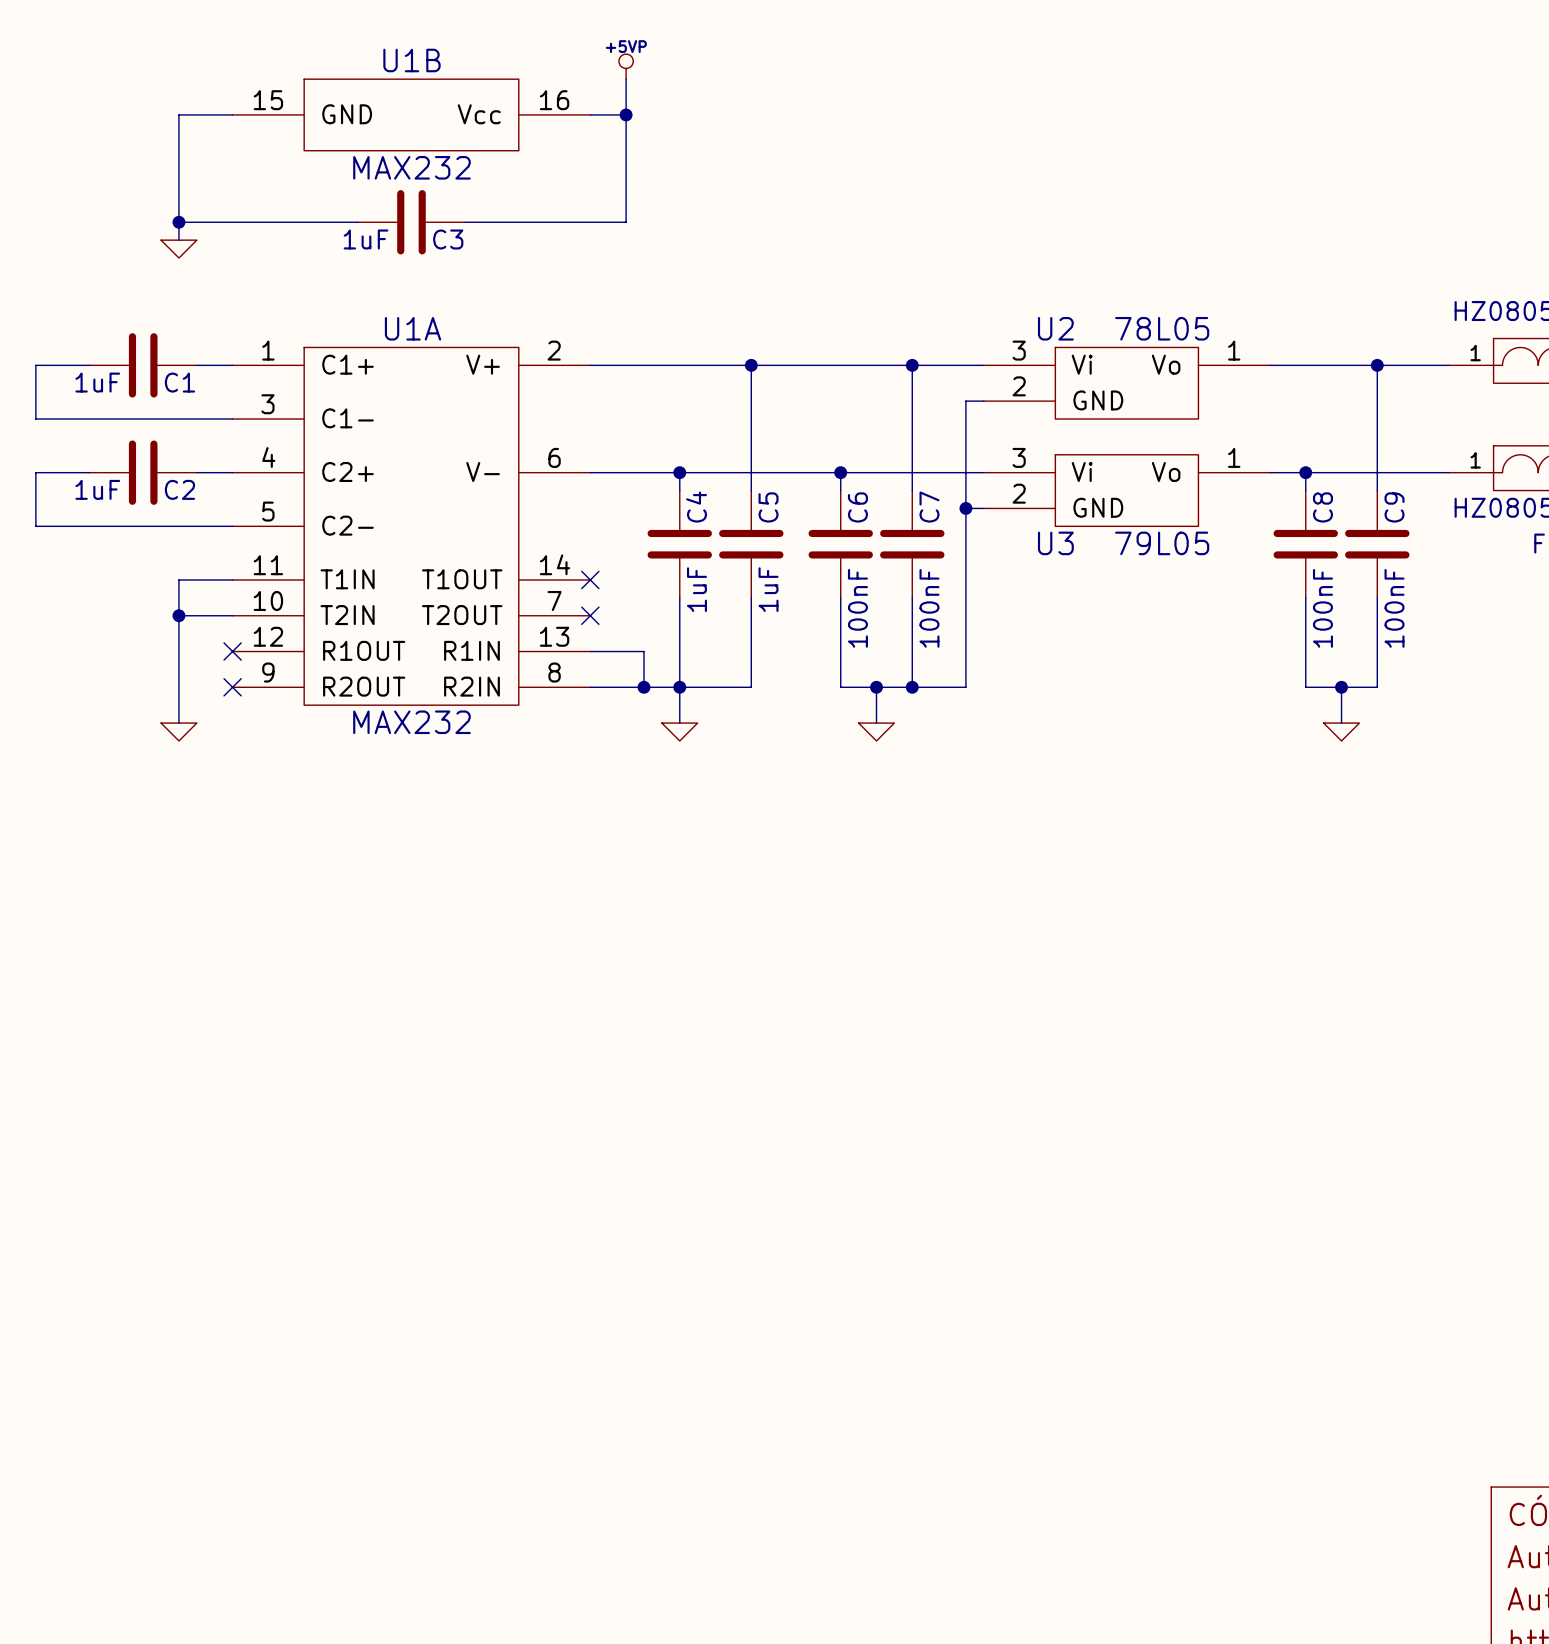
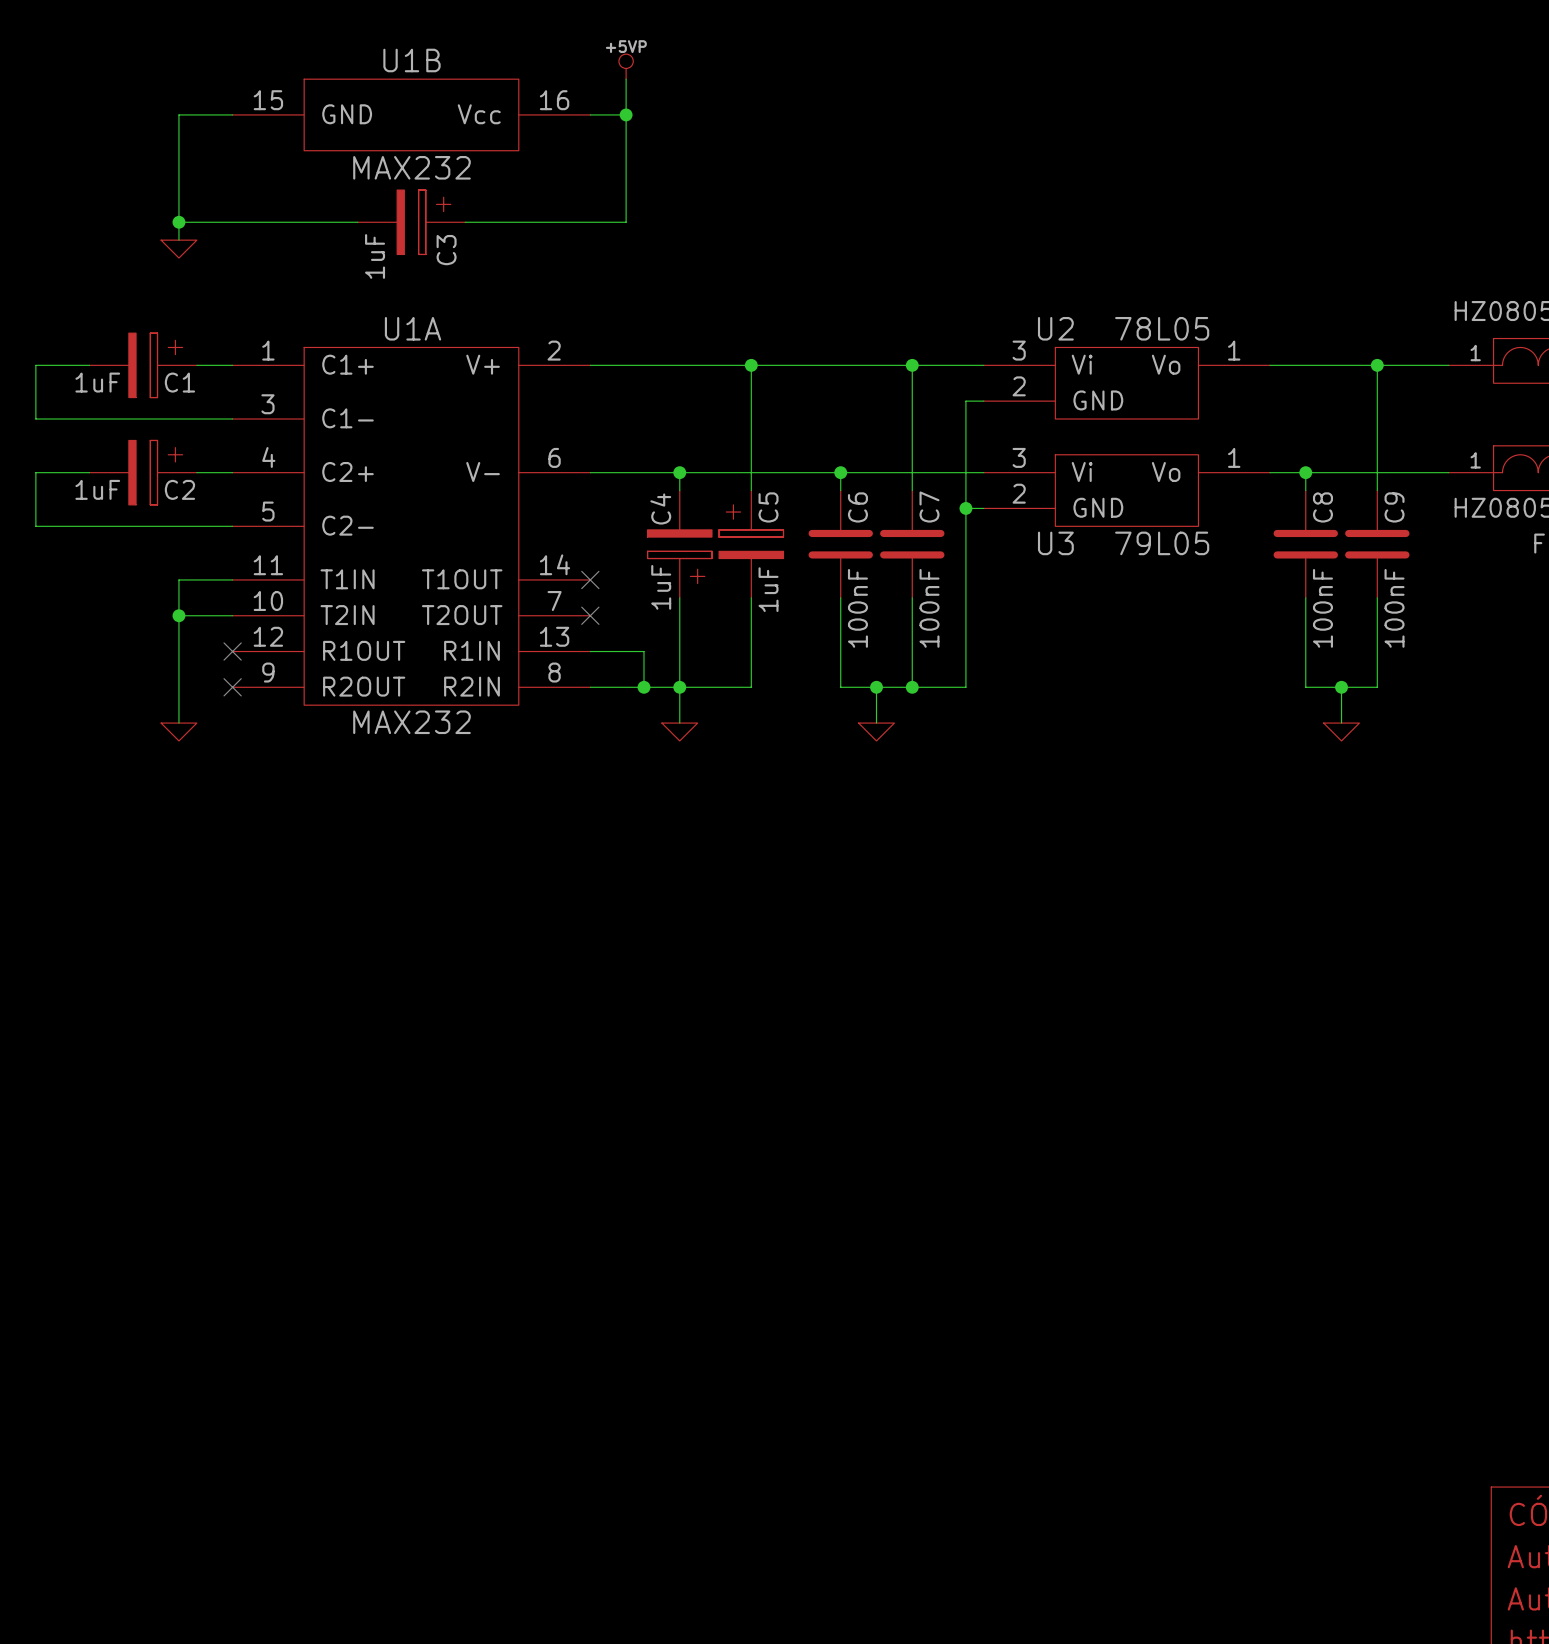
C3 symbol: [357, 190, 466, 255] -> [357, 190, 466, 255]
C1 symbol: [89, 333, 197, 398] -> [89, 333, 197, 398]
C2 symbol: [89, 440, 197, 505] -> [89, 440, 197, 505]
C4 symbol: [647, 490, 712, 598] -> [647, 490, 712, 598]
C5 symbol: [719, 490, 784, 598] -> [719, 490, 784, 598]
C4 name position: C4 (696, 507) -> C4 (660, 509)
C4 value position: 1uF (696, 589) -> 1uF (661, 587)

